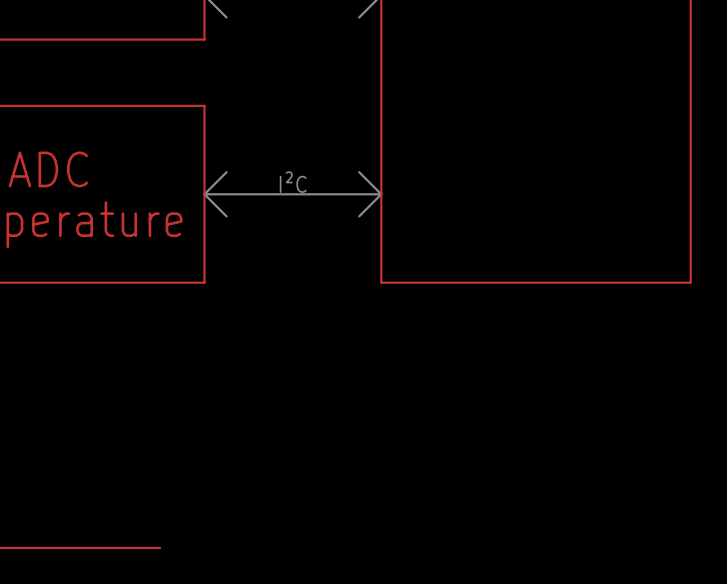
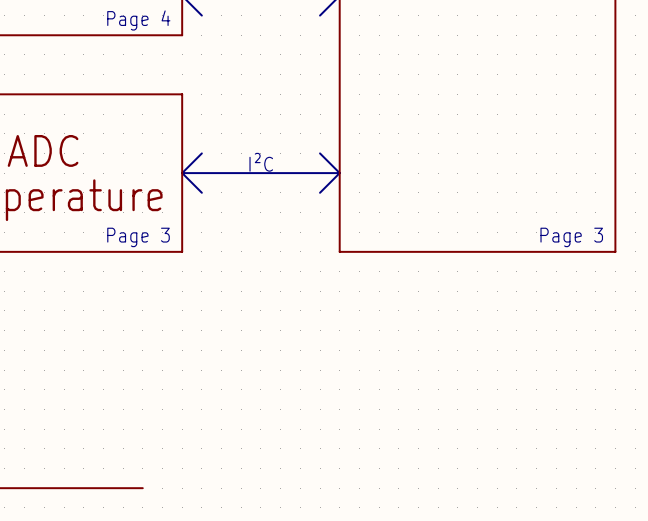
text: none -> Page 4 (138, 20)
text: none -> Page 3 (138, 237)
text: none -> Page 3 (571, 237)

